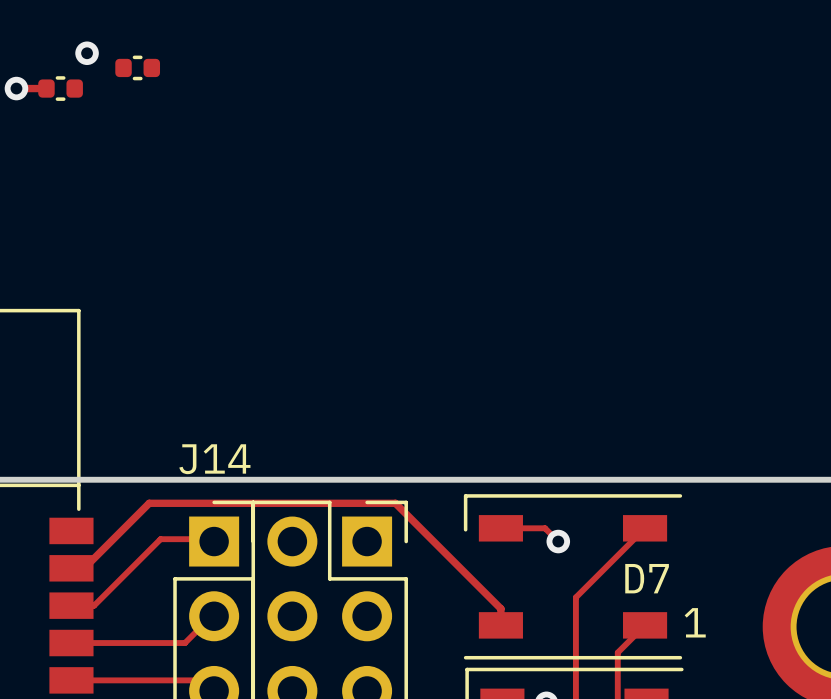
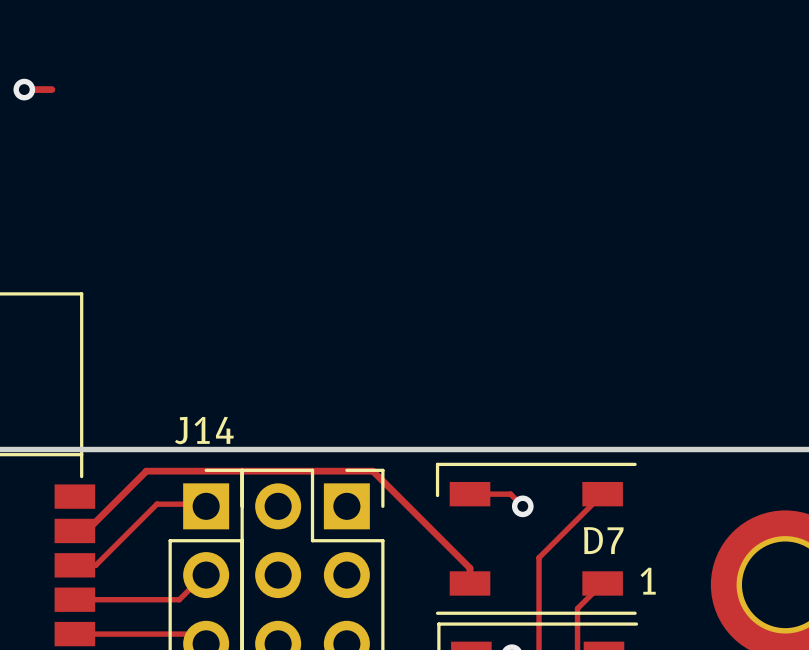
via: (87, 53) -> none
part: (137, 67) -> none
part: (60, 88) -> none

